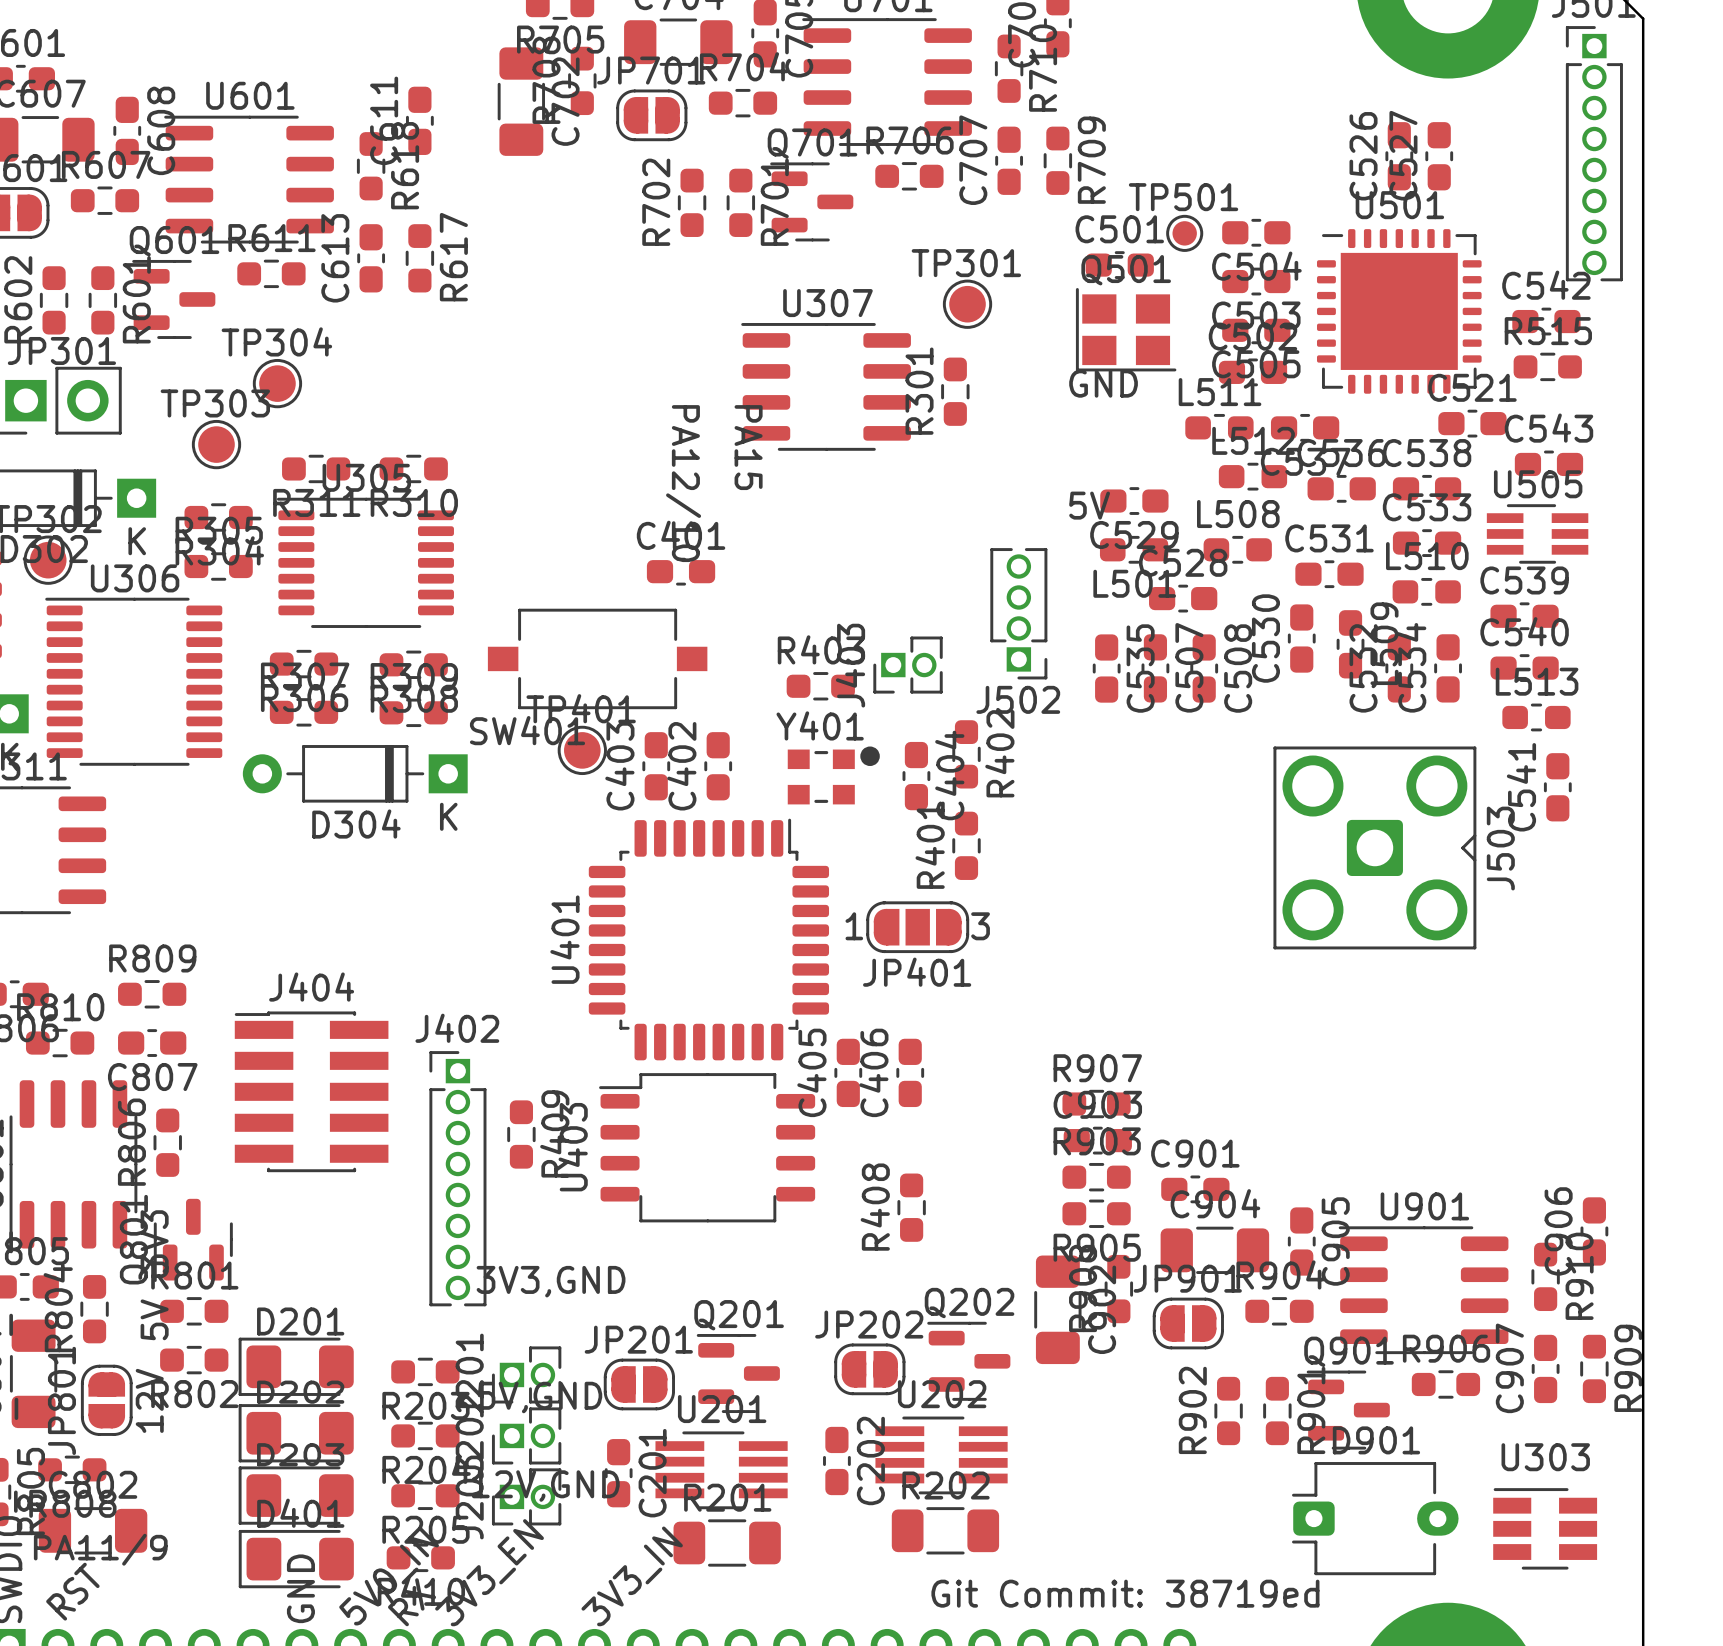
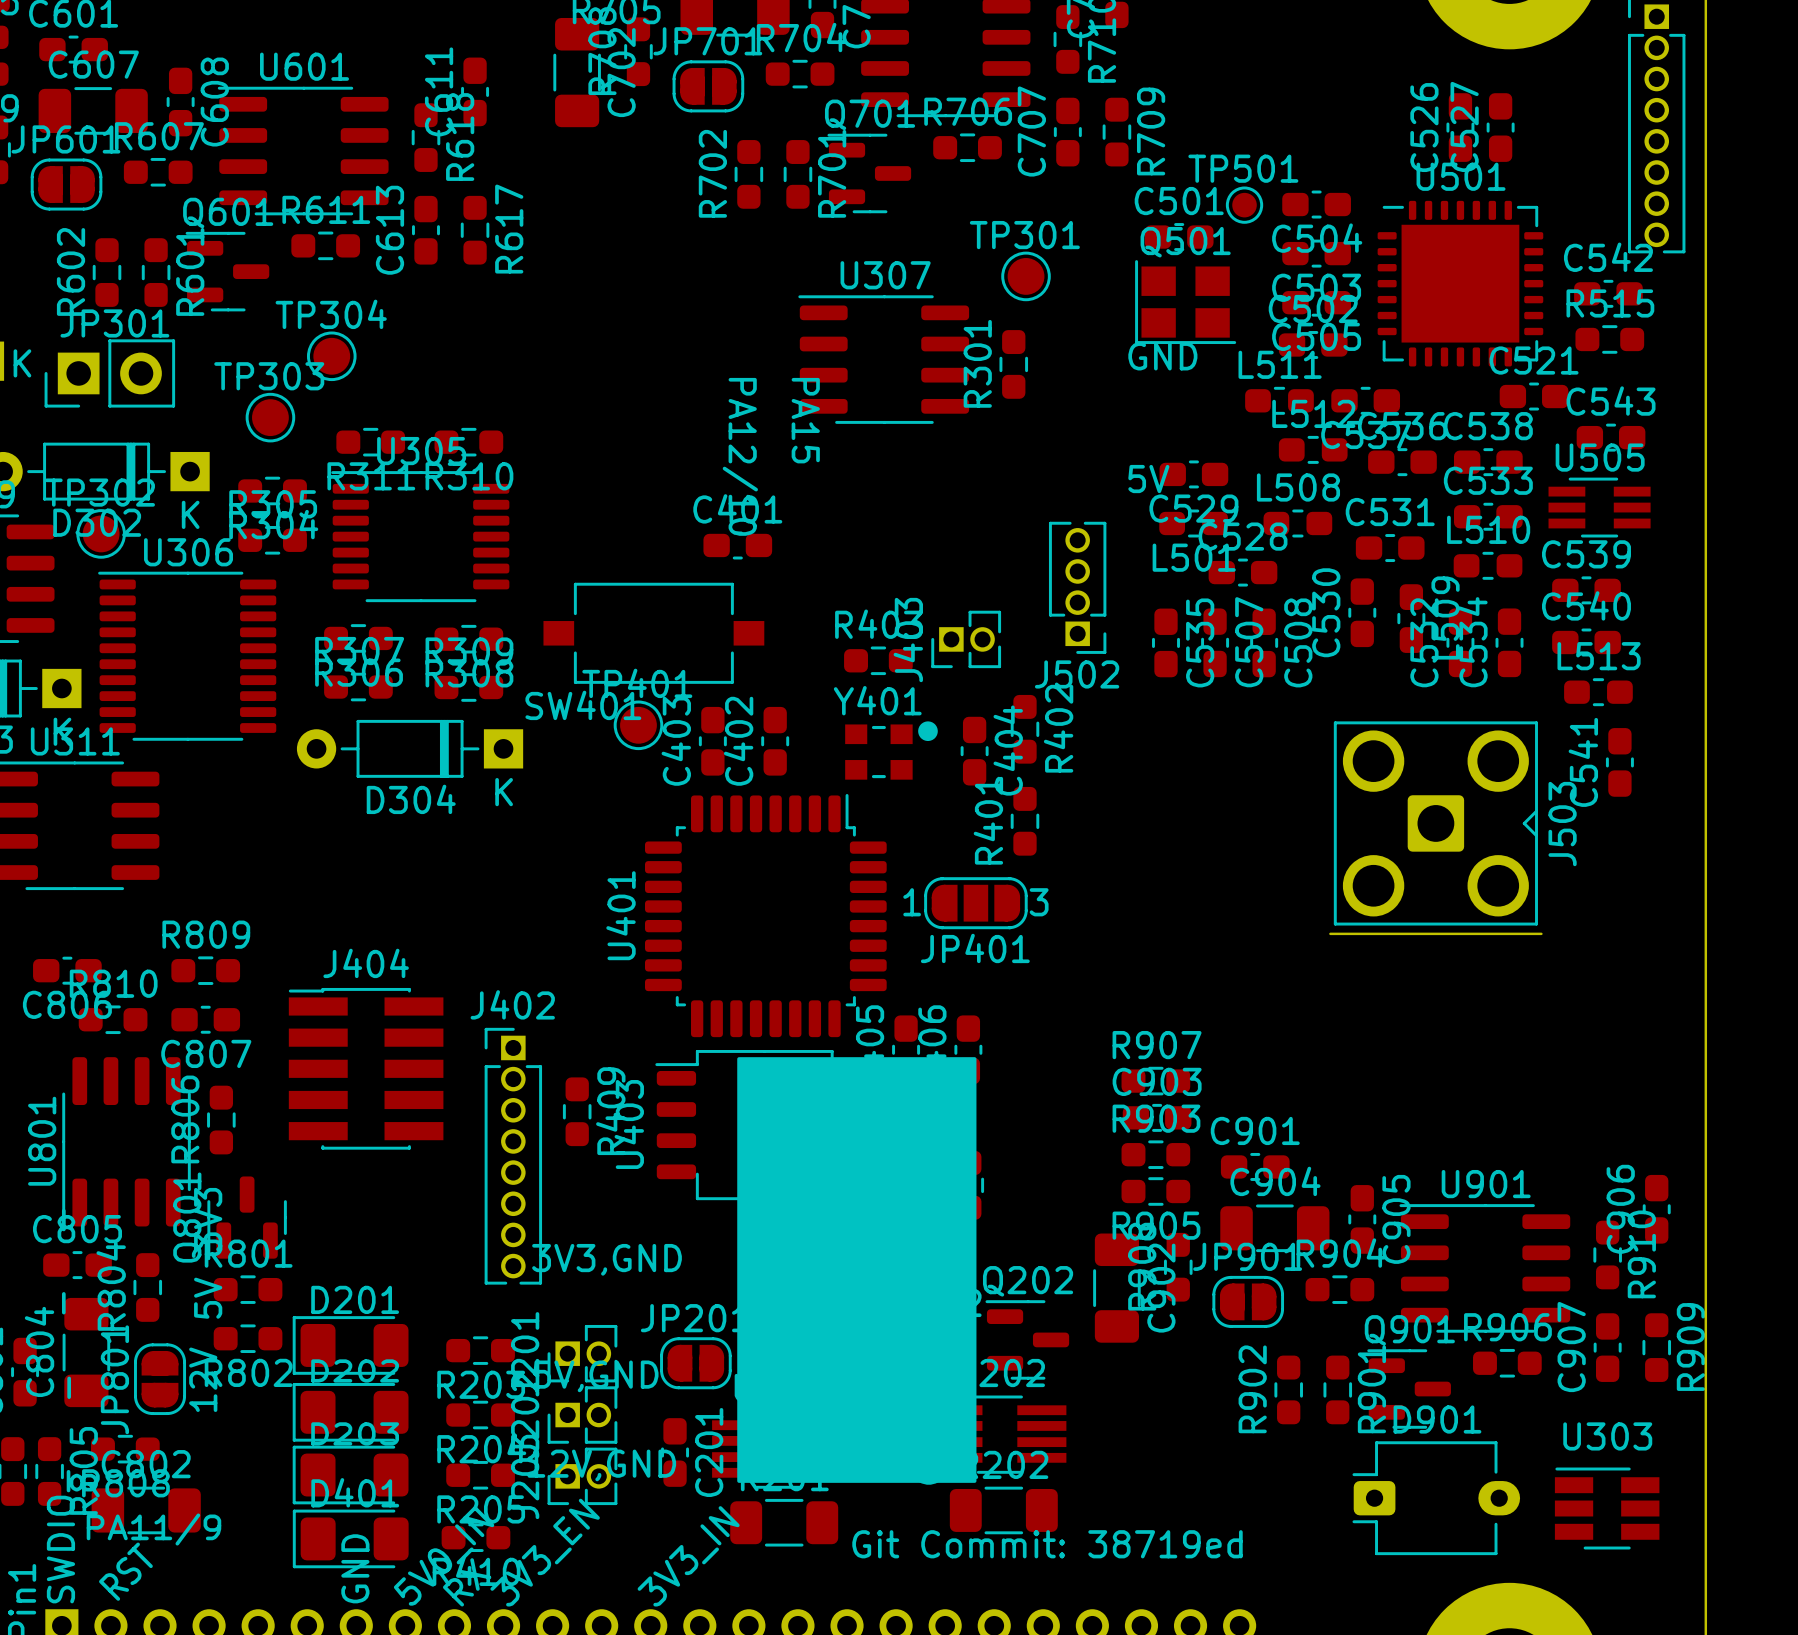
J503 footprint: [1273, 746, 1477, 950] -> [1329, 721, 1543, 936]
drawing: none -> [737, 1057, 977, 1483]
text position: Git Commit: 38719ed (1125, 1593) -> Git Commit: 38719ed (1047, 1544)

